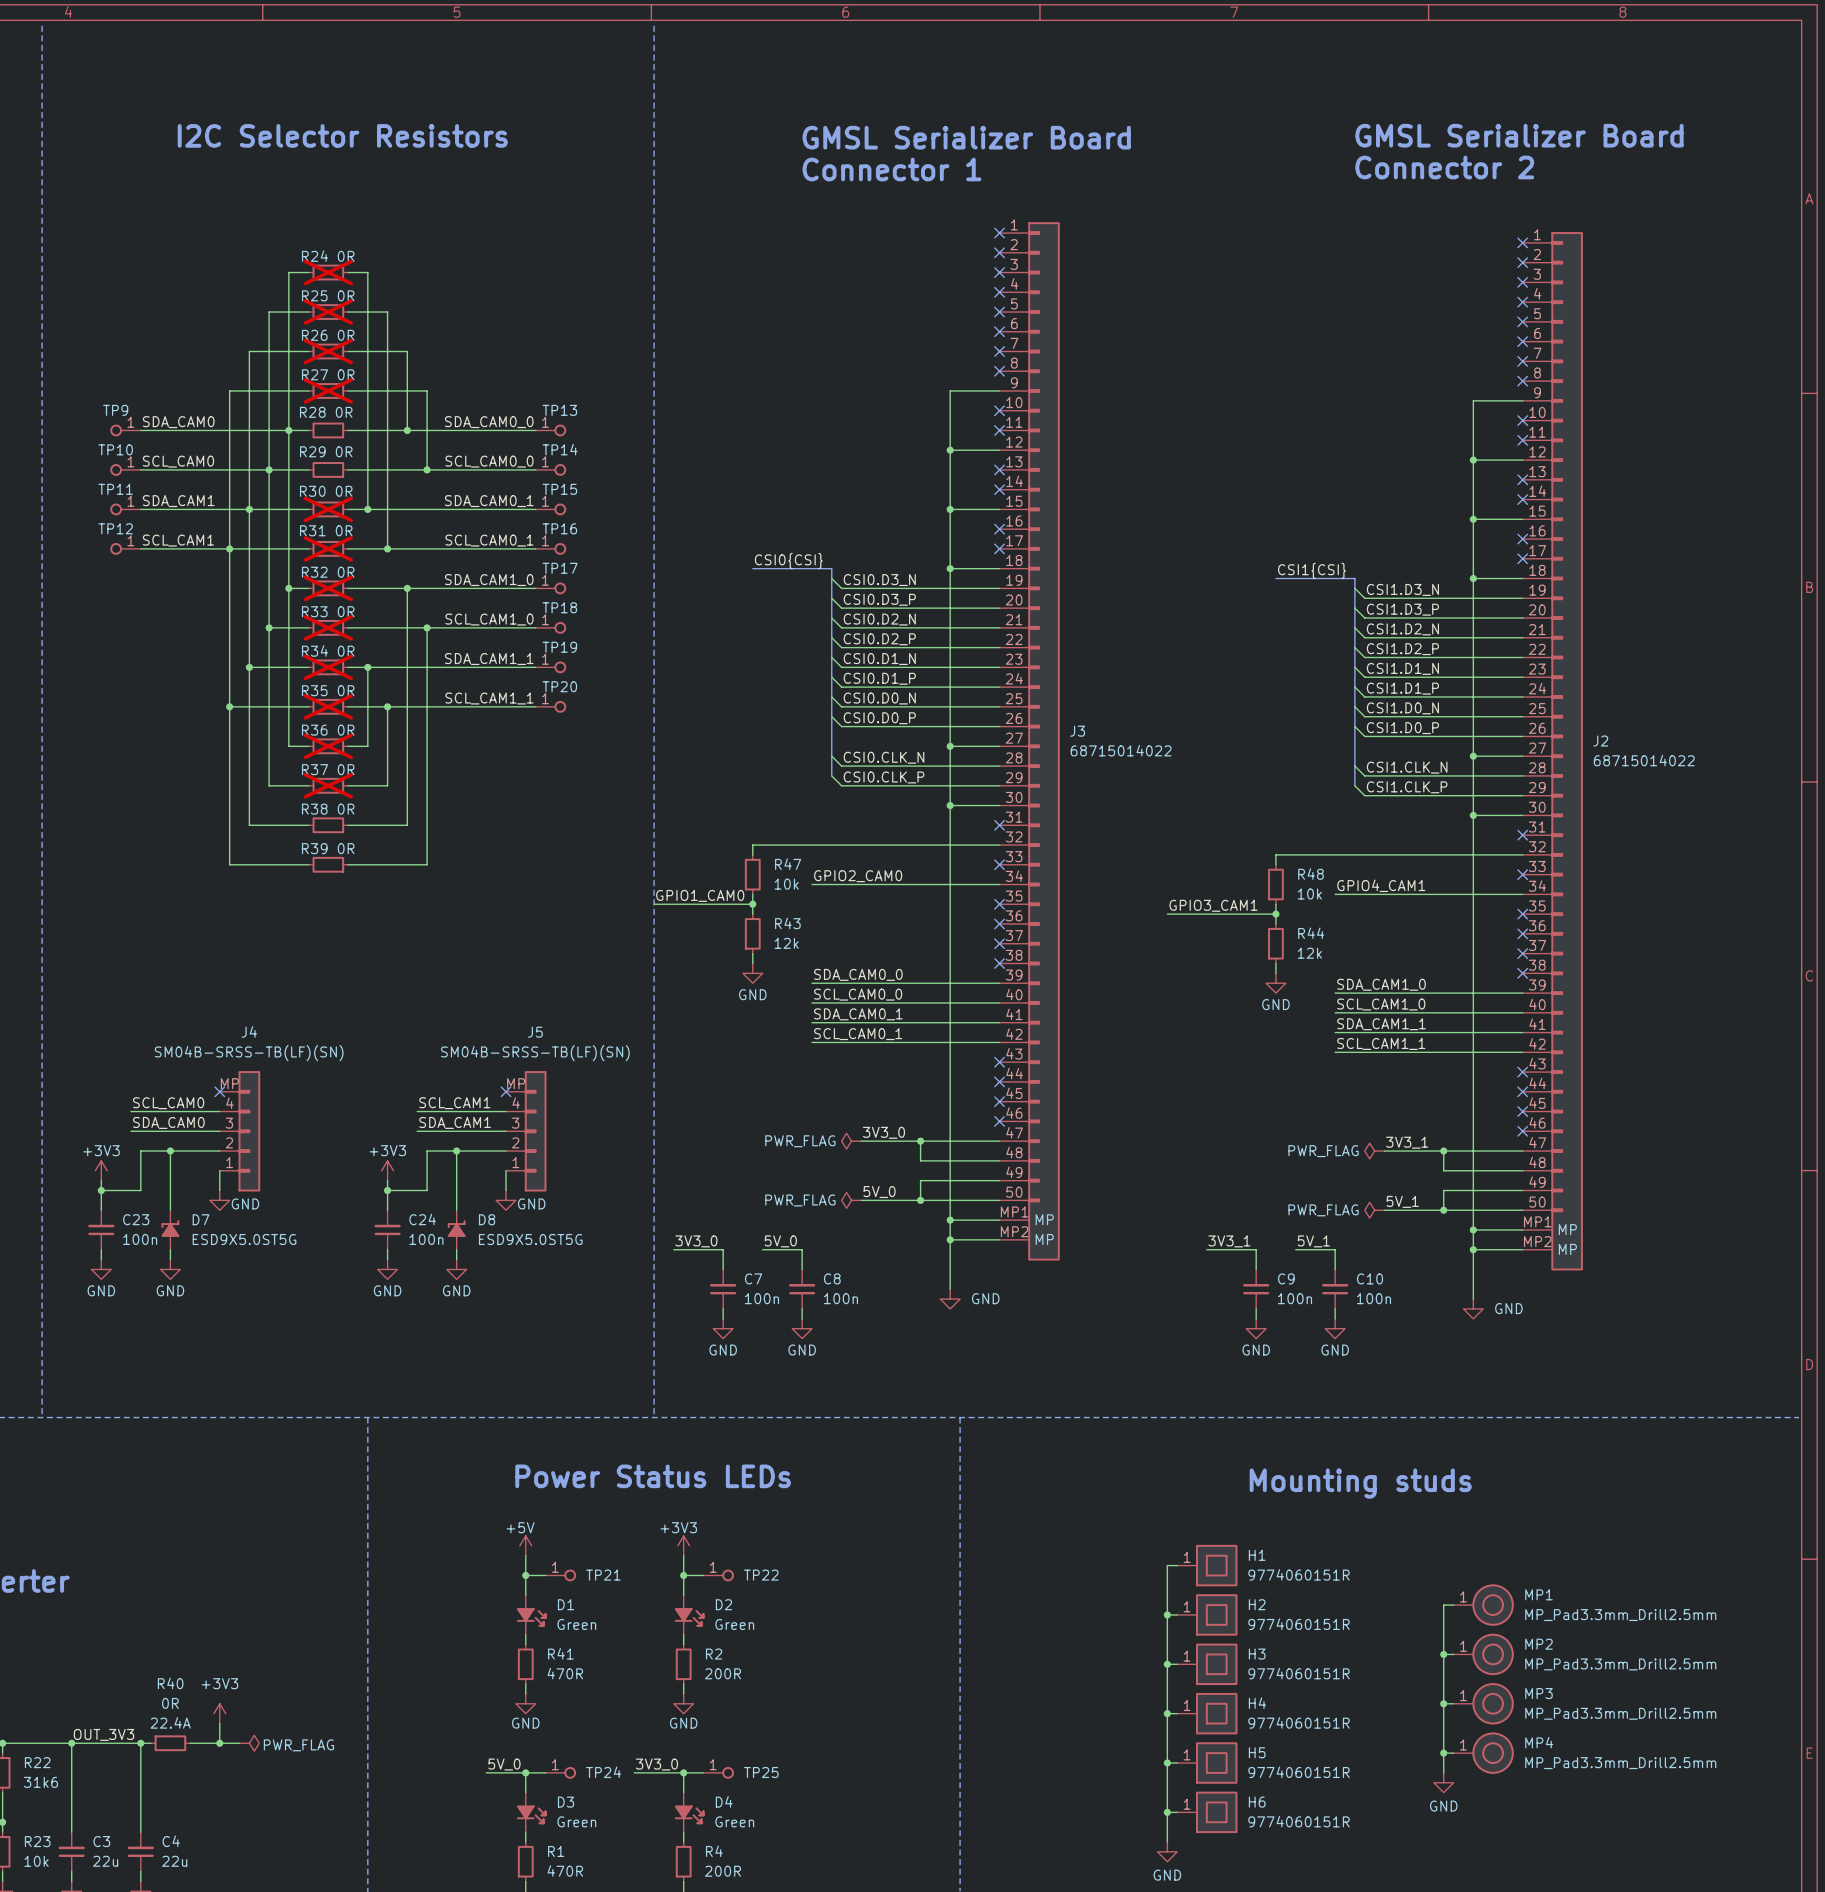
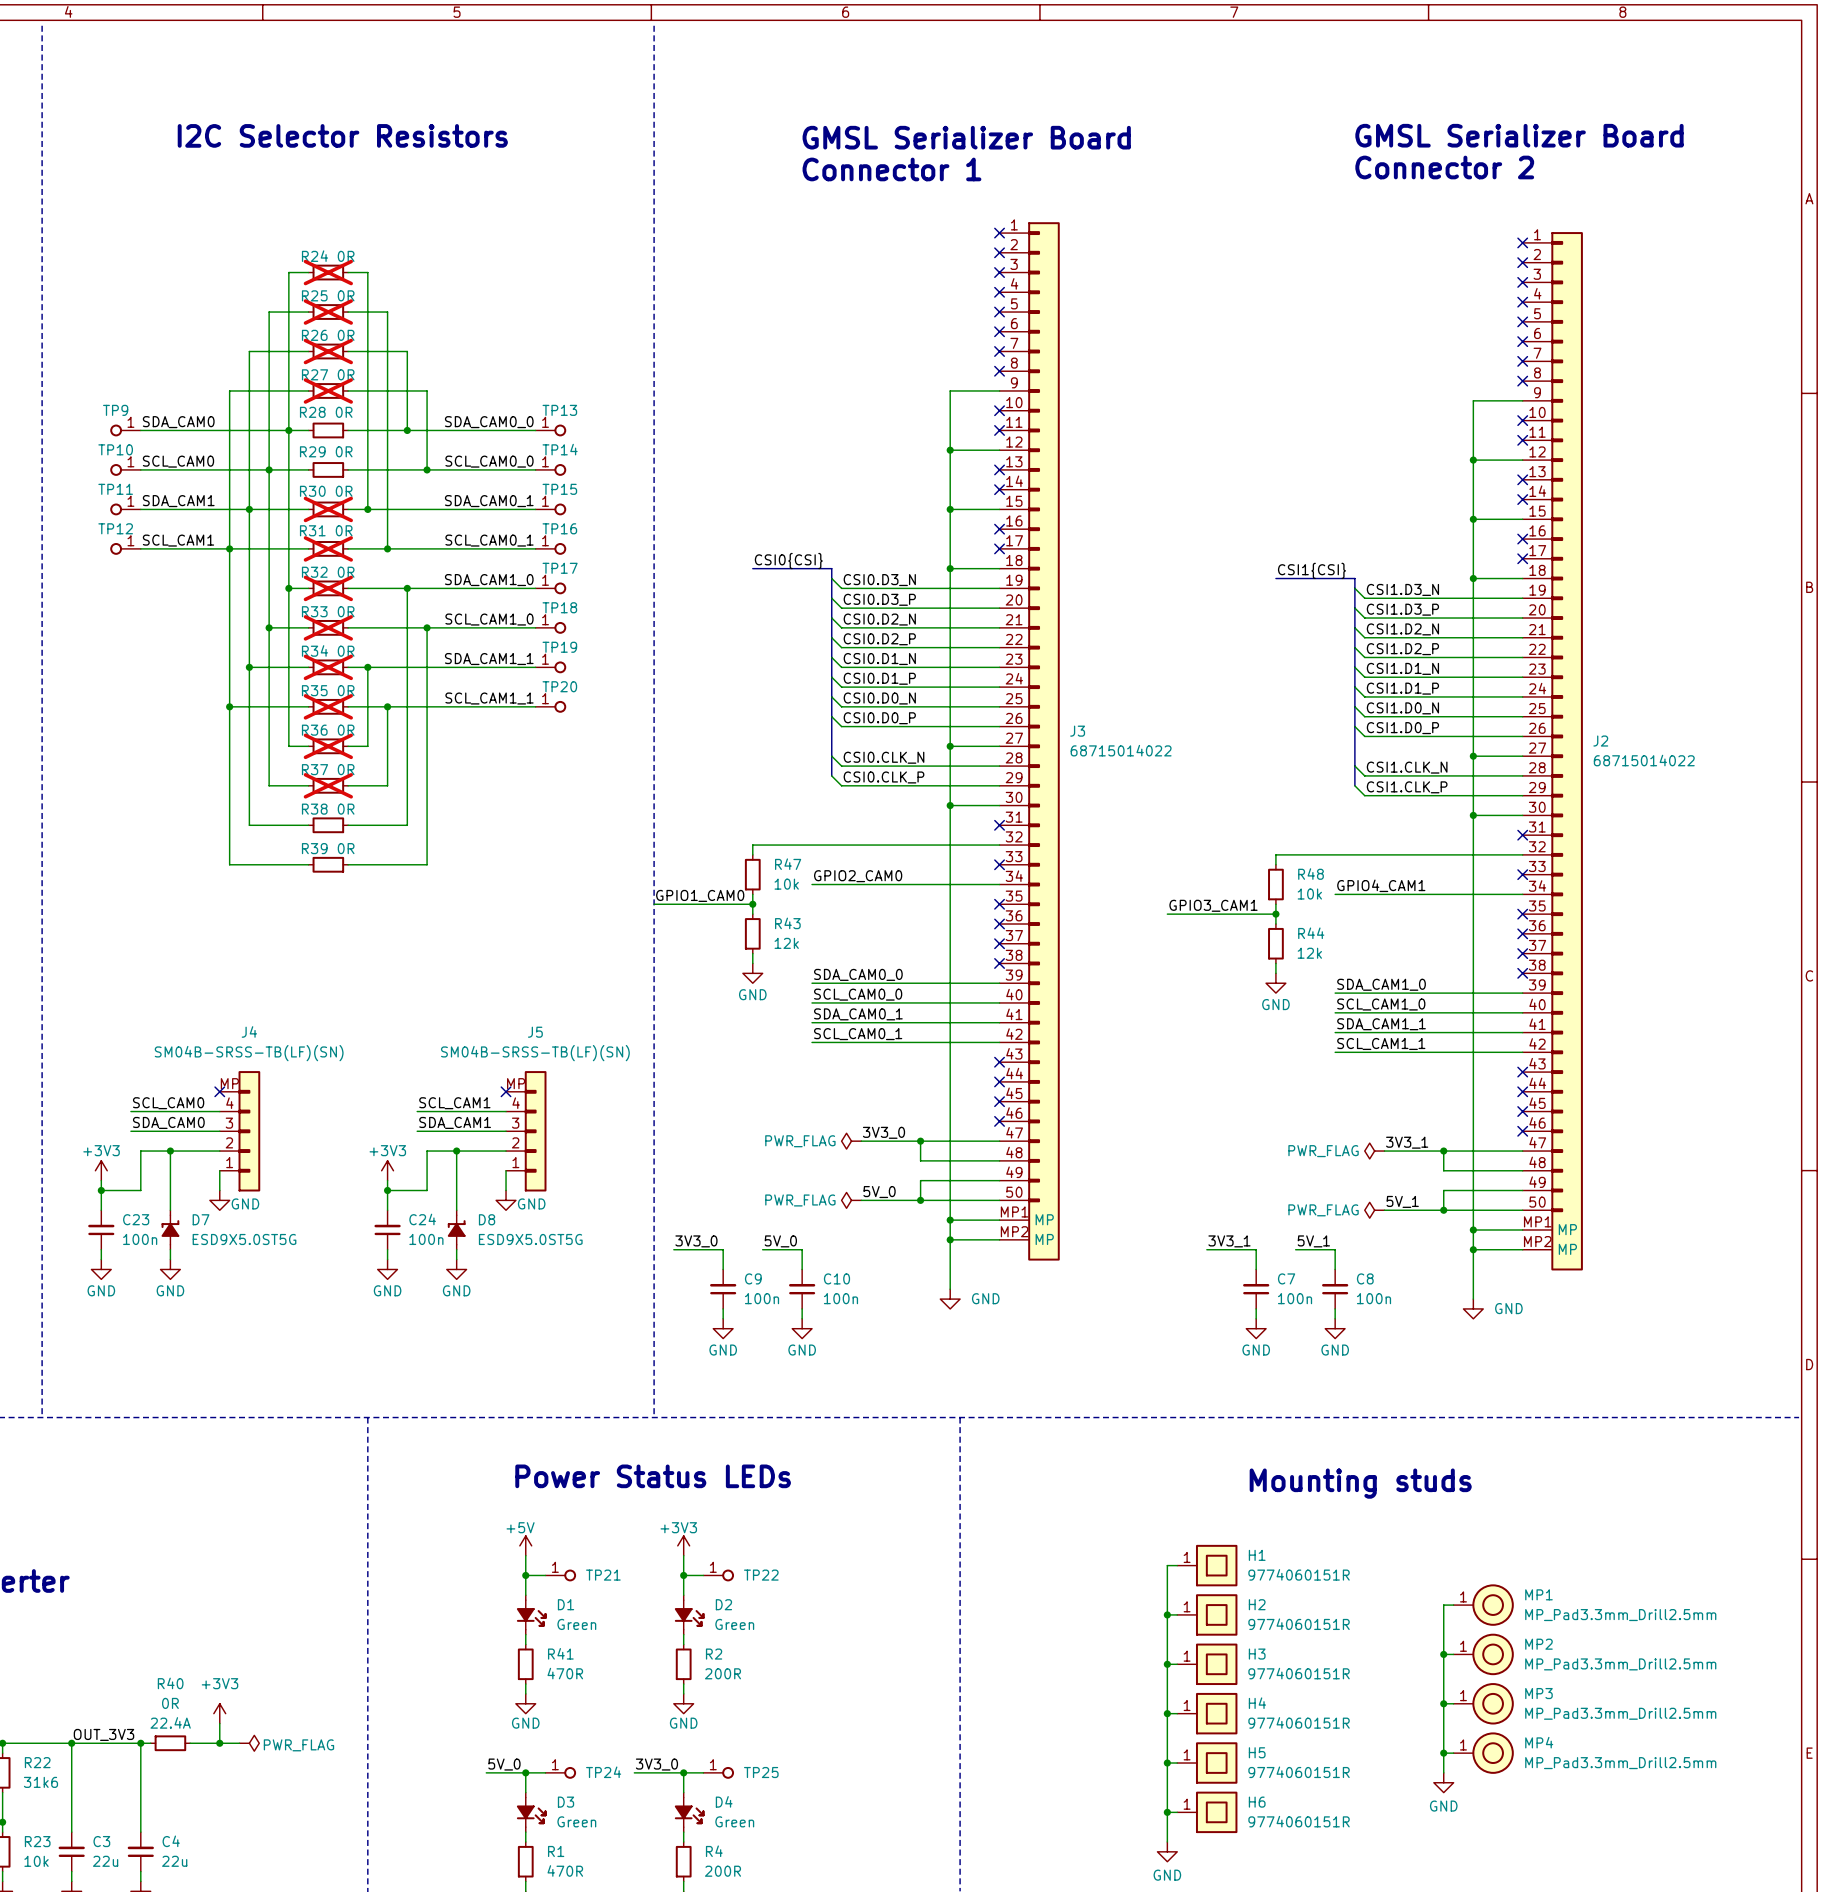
C7 name: C7 (753, 1278) -> C9 (753, 1278)
C8 name: C8 (832, 1278) -> C10 (836, 1278)
C9 name: C9 (1286, 1278) -> C7 (1286, 1278)
C10 name: C10 (1370, 1278) -> C8 (1365, 1278)

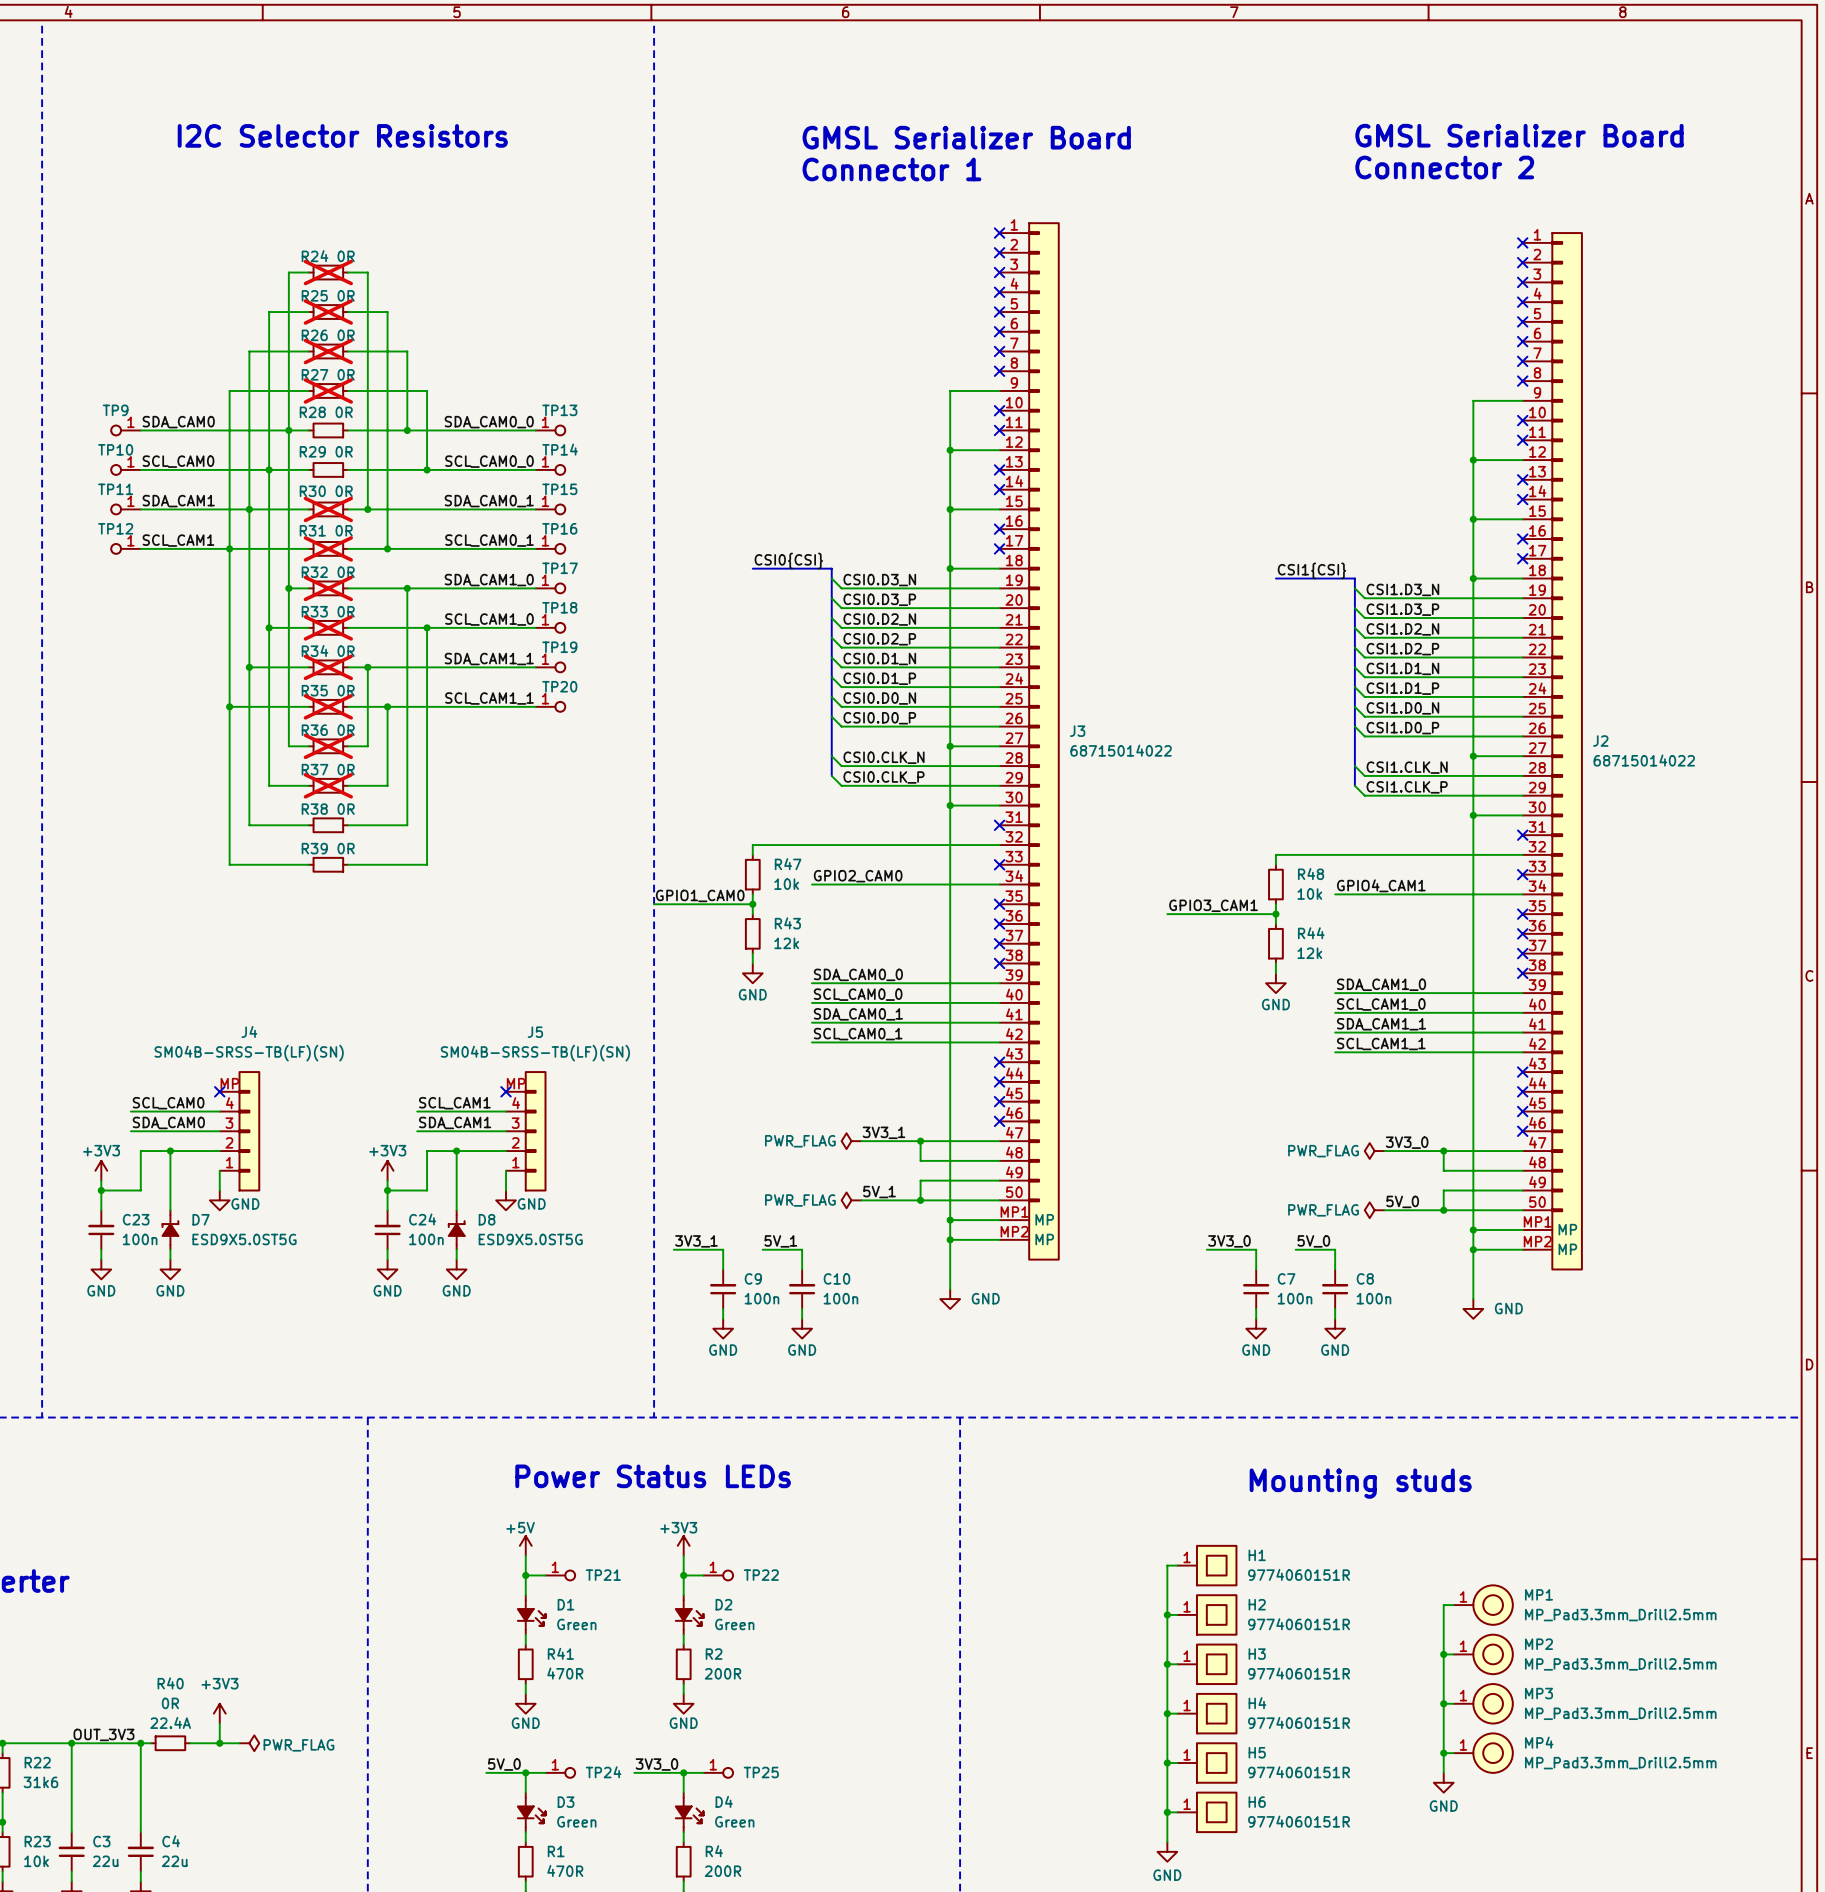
label: 3V3_0 (884, 1132) -> 3V3_1 (884, 1132)
label: 3V3_1 (1407, 1142) -> 3V3_0 (1407, 1142)
label: 5V_0 (879, 1192) -> 5V_1 (879, 1192)
label: 5V_1 (1402, 1201) -> 5V_0 (1402, 1201)
label: 3V3_0 (696, 1241) -> 3V3_1 (696, 1241)
label: 5V_0 (780, 1241) -> 5V_1 (780, 1241)
label: 3V3_1 (1229, 1241) -> 3V3_0 (1229, 1241)
label: 5V_1 (1313, 1241) -> 5V_0 (1313, 1241)

